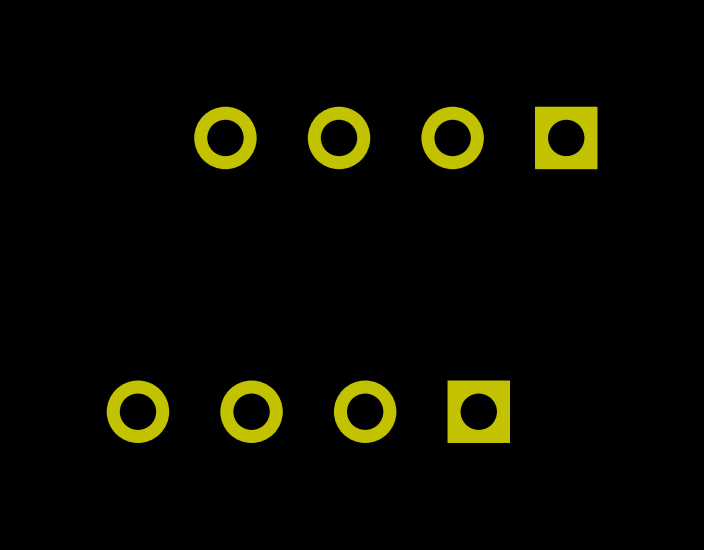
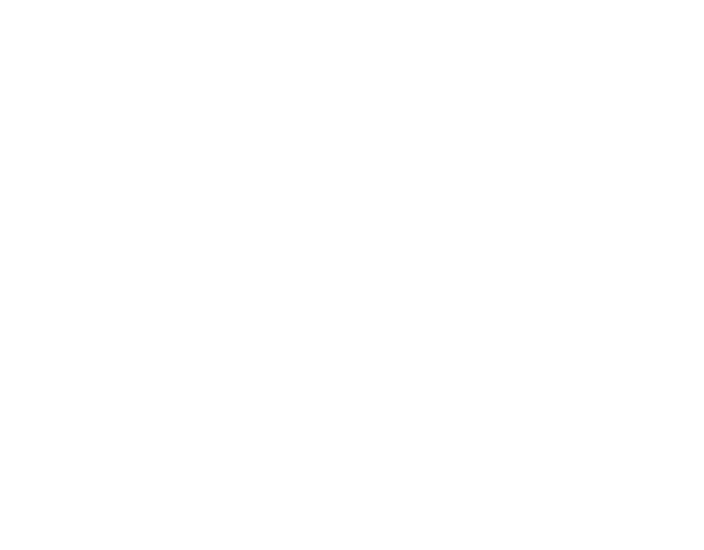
part: (395, 137) -> none
part: (308, 411) -> none

